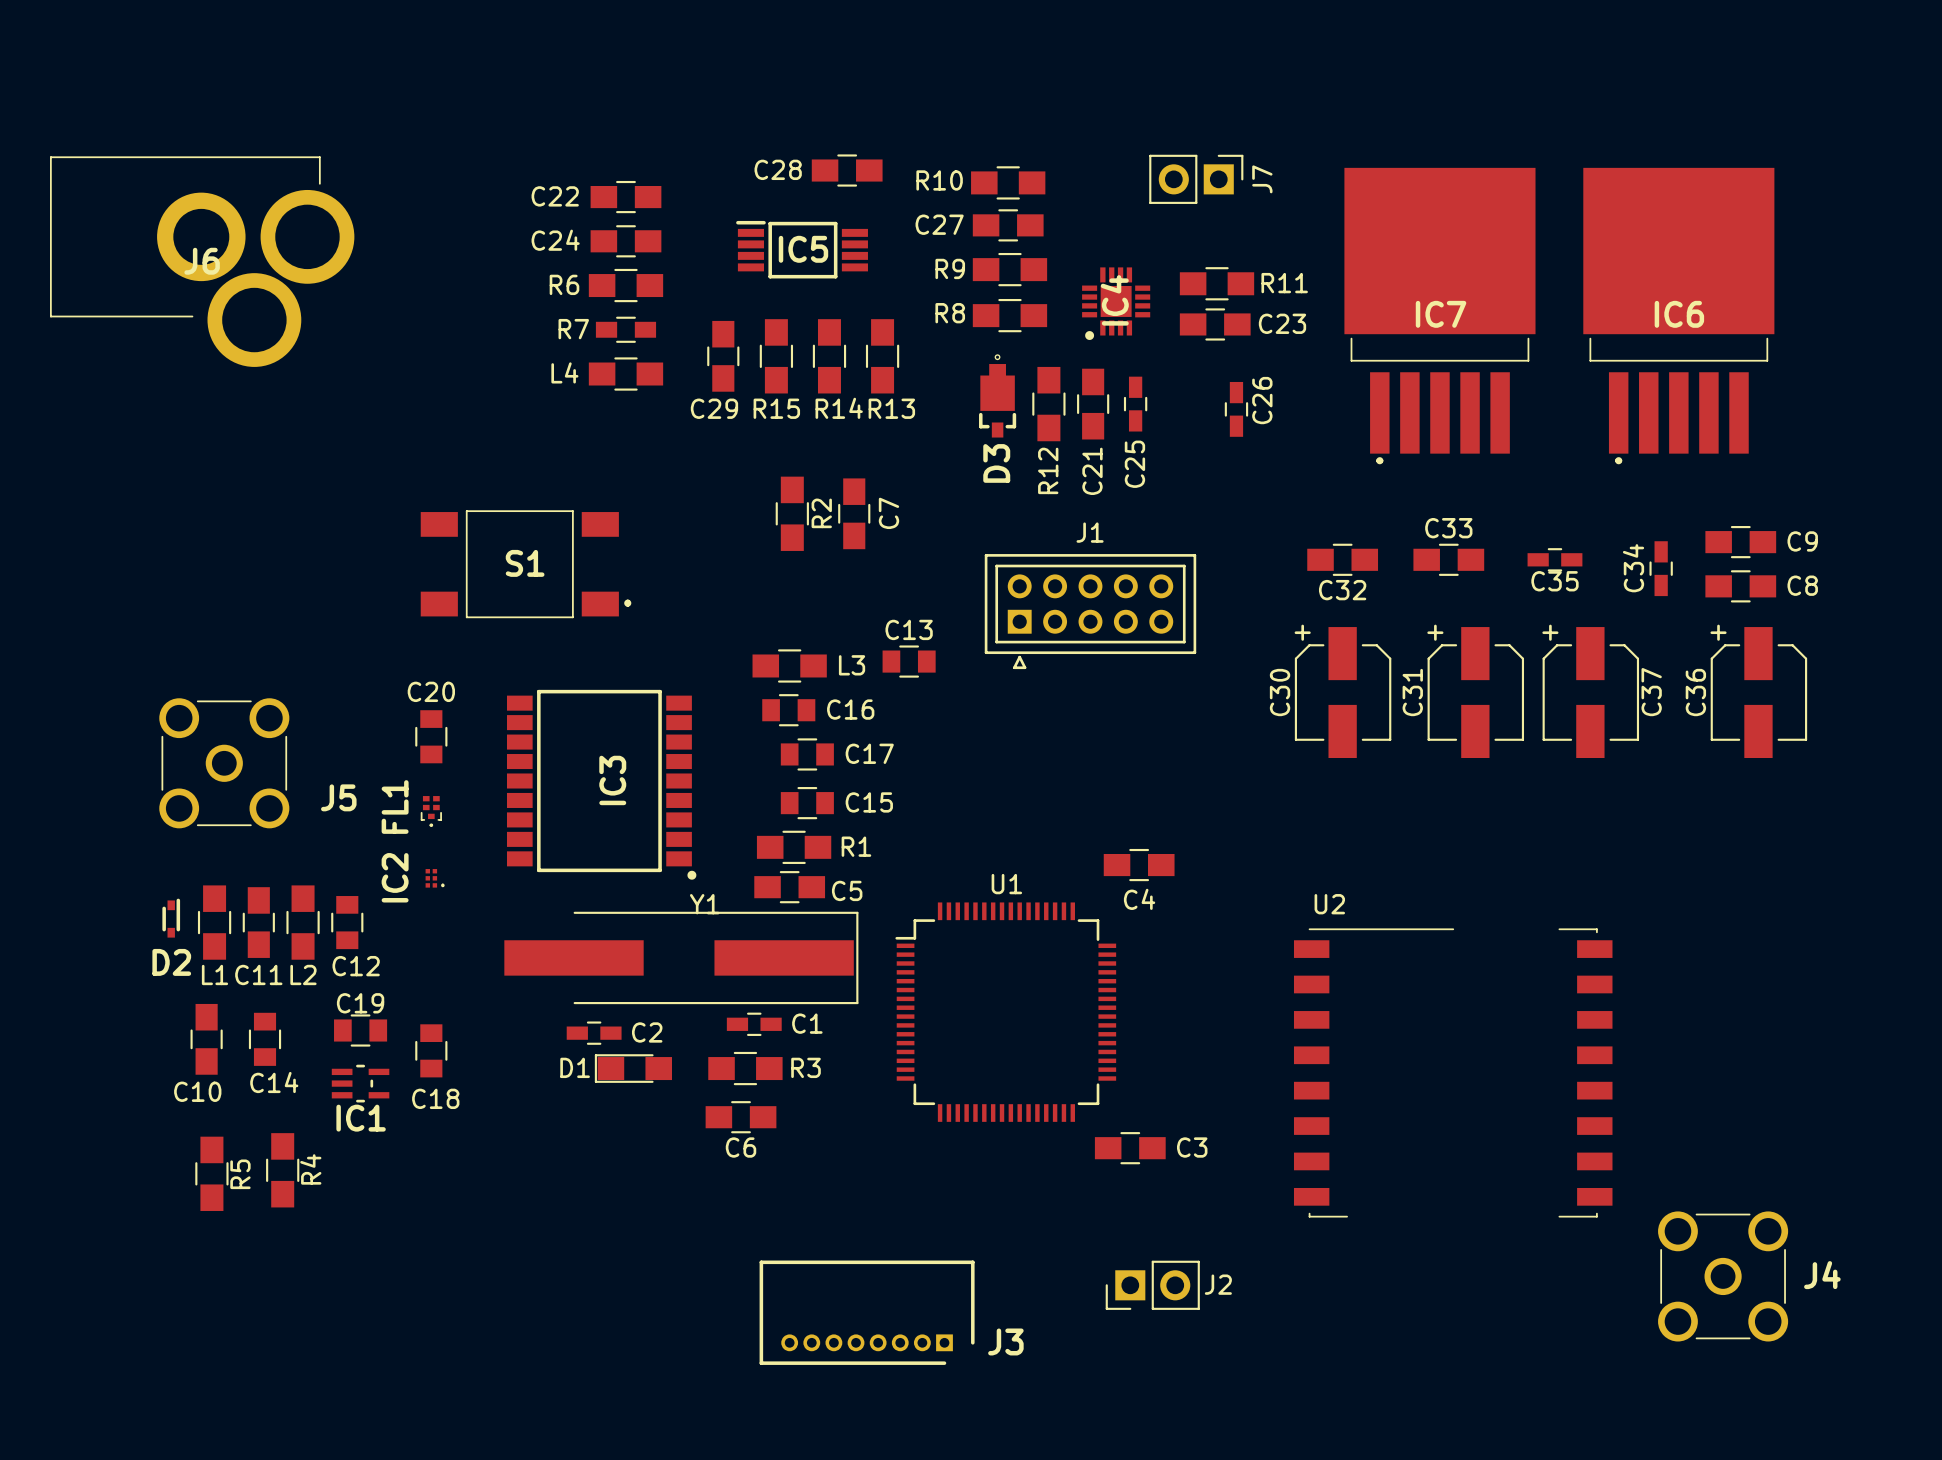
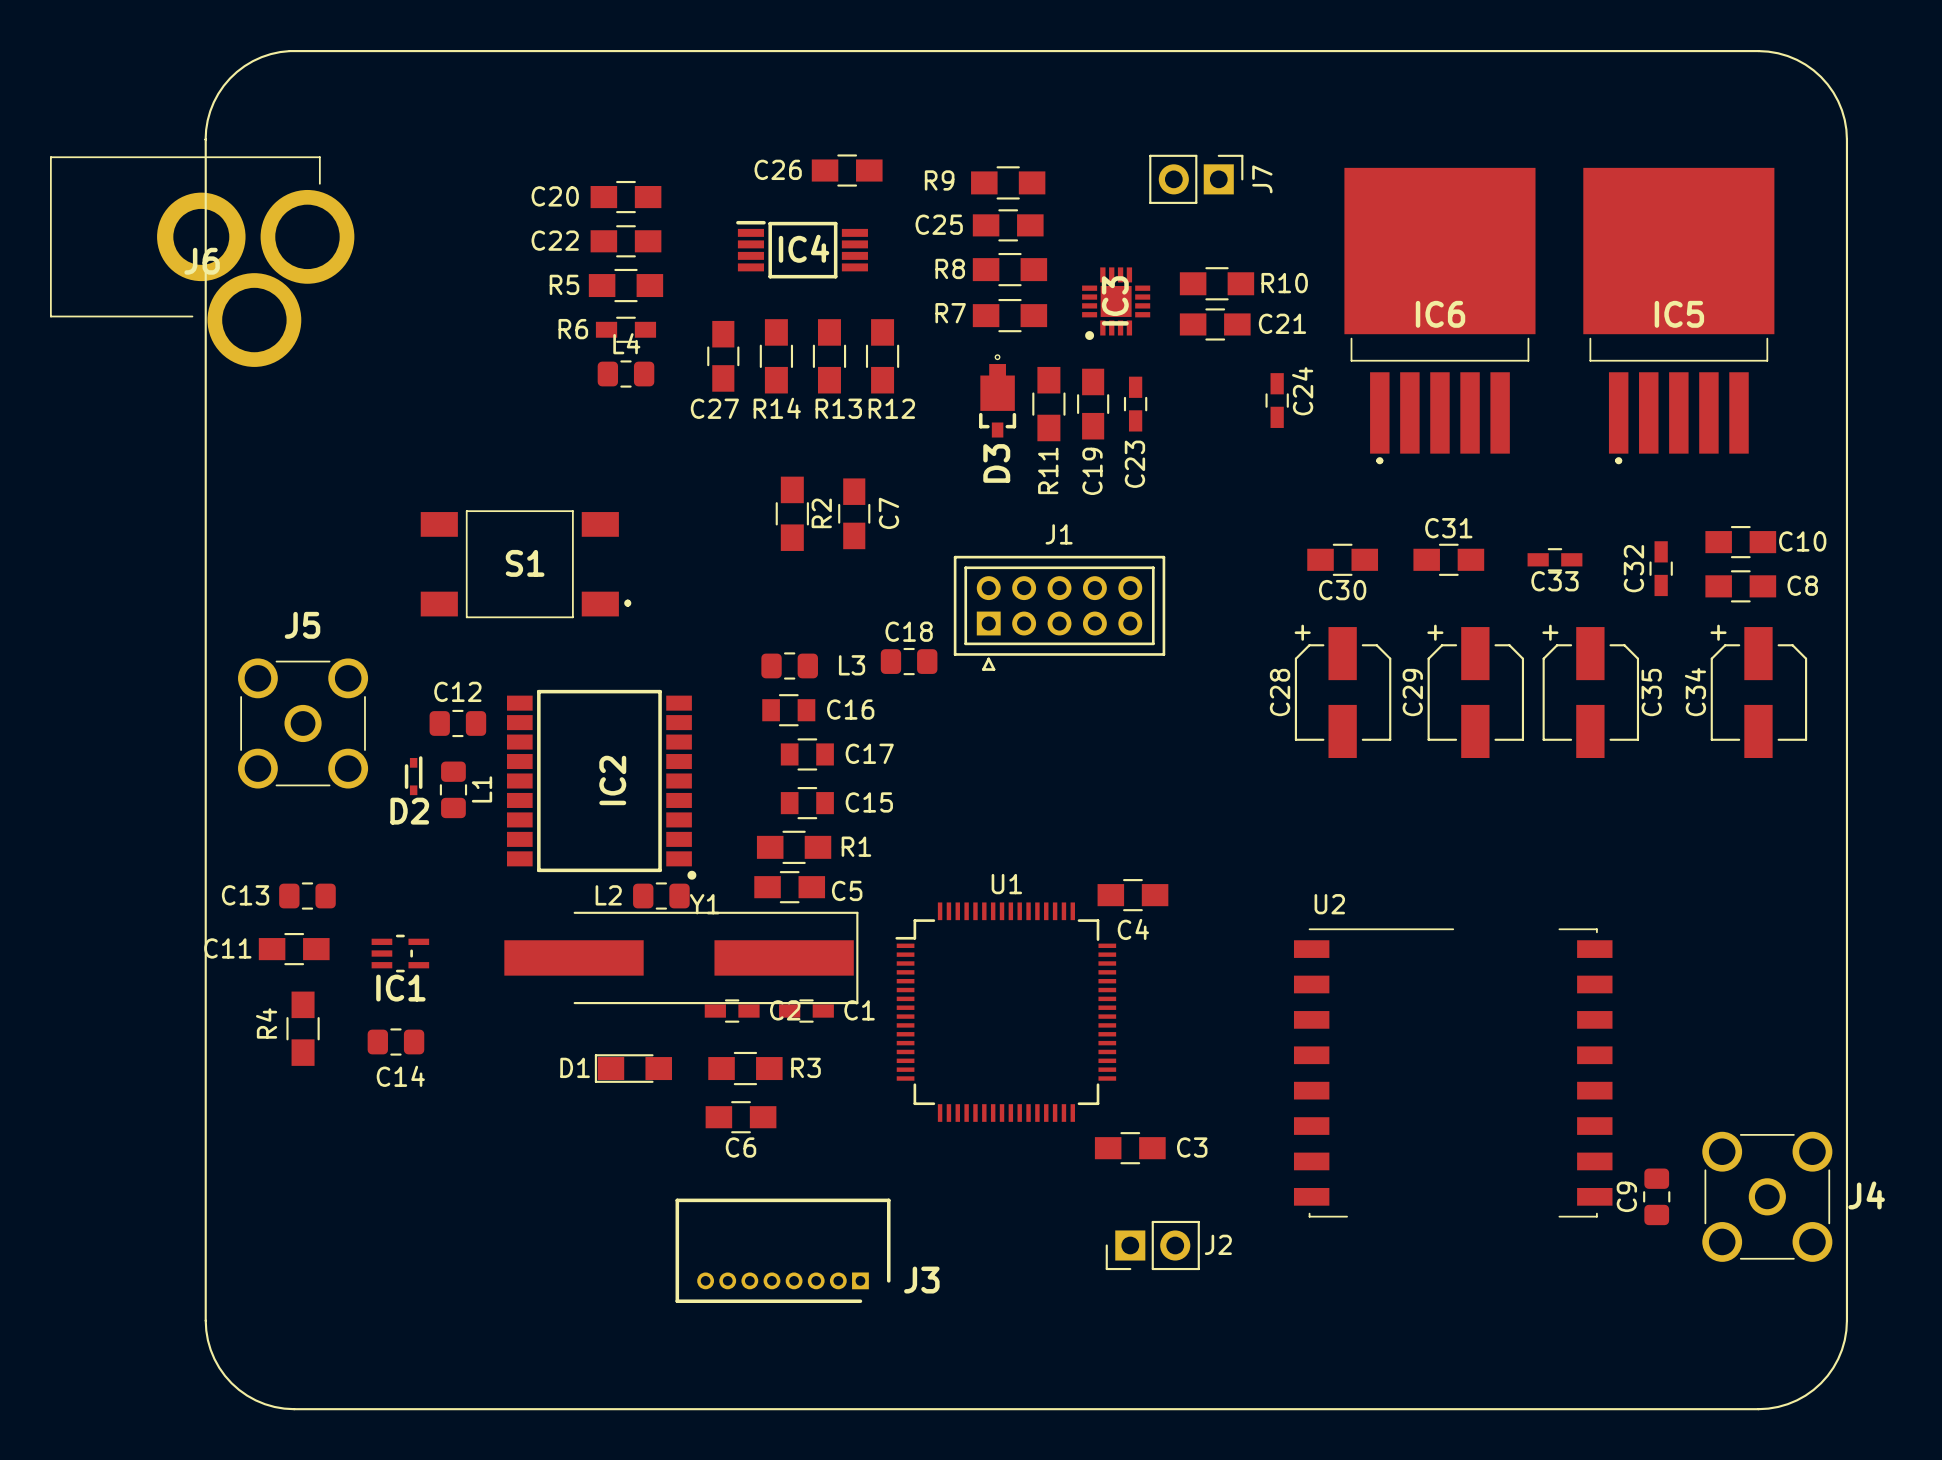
line: none -> (205, 139) (207, 120) (213, 102) (230, 78) (252, 61) (270, 54) (289, 51) (1758, 51) (1787, 56) (1813, 70) (1827, 84) (1838, 101) (1844, 119) (1846, 139) (1846, 1320) (1841, 1349) (1827, 1375) (1813, 1389) (1796, 1400) (1778, 1406) (1758, 1409) (294, 1409) (264, 1404) (239, 1389) (225, 1375) (214, 1359) (207, 1340) (205, 1320) (205, 139)
C28 name: C28 (778, 169) -> C26 (778, 169)
R10 name: R10 (939, 180) -> R9 (939, 180)
C22 name: C22 (555, 196) -> C20 (555, 196)
C27 name: C27 (939, 224) -> C25 (939, 224)
C24 name: C24 (555, 240) -> C22 (555, 240)
IC5 name: IC5 (803, 249) -> IC4 (804, 248)
R9 name: R9 (950, 268) -> R8 (950, 268)
R11 name: R11 (1284, 283) -> R10 (1284, 283)
R6 name: R6 (564, 284) -> R5 (564, 284)
IC4 name: IC4 (1114, 300) -> IC3 (1115, 300)
R8 name: R8 (950, 313) -> R7 (950, 313)
IC7 name: IC7 (1441, 314) -> IC6 (1440, 314)
IC6 name: IC6 (1679, 314) -> IC5 (1679, 314)
C23 name: C23 (1282, 323) -> C21 (1282, 323)
R7 name: R7 (573, 329) -> R6 (573, 329)
L4 footprint: [588, 357, 664, 391] -> [597, 360, 655, 388]
L4 name position: L4 (564, 372) -> L4 (626, 343)
C24: none -> (1277, 400)
C29 name: C29 (714, 408) -> C27 (714, 408)
R15 name: R15 (776, 408) -> R14 (777, 408)
R14 name: R14 (839, 408) -> R13 (838, 408)
R13 name: R13 (891, 408) -> R12 (891, 408)
C26: (1236, 409) -> none
C25 name: C25 (1134, 464) -> C23 (1134, 464)
R12 name: R12 (1048, 470) -> R11 (1048, 470)
C21 name: C21 (1092, 471) -> C19 (1092, 471)
C33 name: C33 (1448, 528) -> C31 (1448, 528)
C9 name: C9 (1802, 541) -> C10 (1802, 541)
C34 name: C34 (1633, 568) -> C32 (1633, 568)
C35 name: C35 (1554, 581) -> C33 (1554, 581)
C32 name: C32 (1342, 590) -> C30 (1342, 590)
J1 position: (1090, 611) -> (1059, 613)
C13 name position: C13 (909, 629) -> C13 (245, 895)
C13 footprint: [882, 645, 936, 678] -> [279, 882, 336, 910]
L3 footprint: [752, 649, 827, 683] -> [761, 652, 818, 680]
C30 name: C30 (1280, 692) -> C28 (1280, 692)
C31 name: C31 (1412, 692) -> C29 (1412, 692)
C37 name: C37 (1651, 692) -> C35 (1651, 692)
C36 name: C36 (1695, 692) -> C34 (1695, 692)
C20: (431, 736) -> none
J5 position: (224, 763) -> (303, 723)
IC3 name: IC3 (612, 780) -> IC2 (612, 780)
J5 name position: J5 (338, 797) -> J5 (302, 625)
FL1: (431, 811) -> none
C4 position: (1139, 865) -> (1132, 895)
IC2: (435, 878) -> none
L1 footprint: [197, 885, 232, 960] -> [439, 761, 468, 819]
L2 footprint: [286, 885, 320, 960] -> [633, 882, 690, 910]
C12 footprint: [331, 896, 364, 950] -> [429, 709, 487, 738]
D2 position: (171, 918) -> (413, 775)
C11 rotation: 0° (258, 922) -> 90° clockwise (294, 949)
C11 position: (258, 922) -> (294, 949)
D2 name position: D2 (171, 962) -> D2 (409, 811)
C12 name position: C12 (356, 966) -> C12 (457, 691)
L1 name position: L1 (214, 974) -> L1 (481, 789)
L2 name position: L2 (303, 974) -> L2 (608, 895)
C14 footprint: [248, 1012, 282, 1066] -> [367, 1028, 425, 1056]
C18 footprint: [415, 1024, 448, 1078] -> [880, 647, 938, 676]
C1 position: (754, 1024) -> (806, 1011)
C19: (360, 1030) -> none
C2 position: (594, 1033) -> (732, 1011)
C10: (206, 1039) -> none
IC1 position: (360, 1083) -> (400, 953)
C18 name position: C18 (435, 1098) -> C18 (909, 631)
R4 name position: R4 (310, 1169) -> R4 (266, 1023)
R4 position: (282, 1170) -> (303, 1028)
R5: (211, 1173) -> none
C9: none -> (1656, 1196)
J4 position: (1723, 1276) -> (1767, 1196)
J2 position: (1152, 1285) -> (1152, 1245)
J3 position: (867, 1312) -> (783, 1250)

